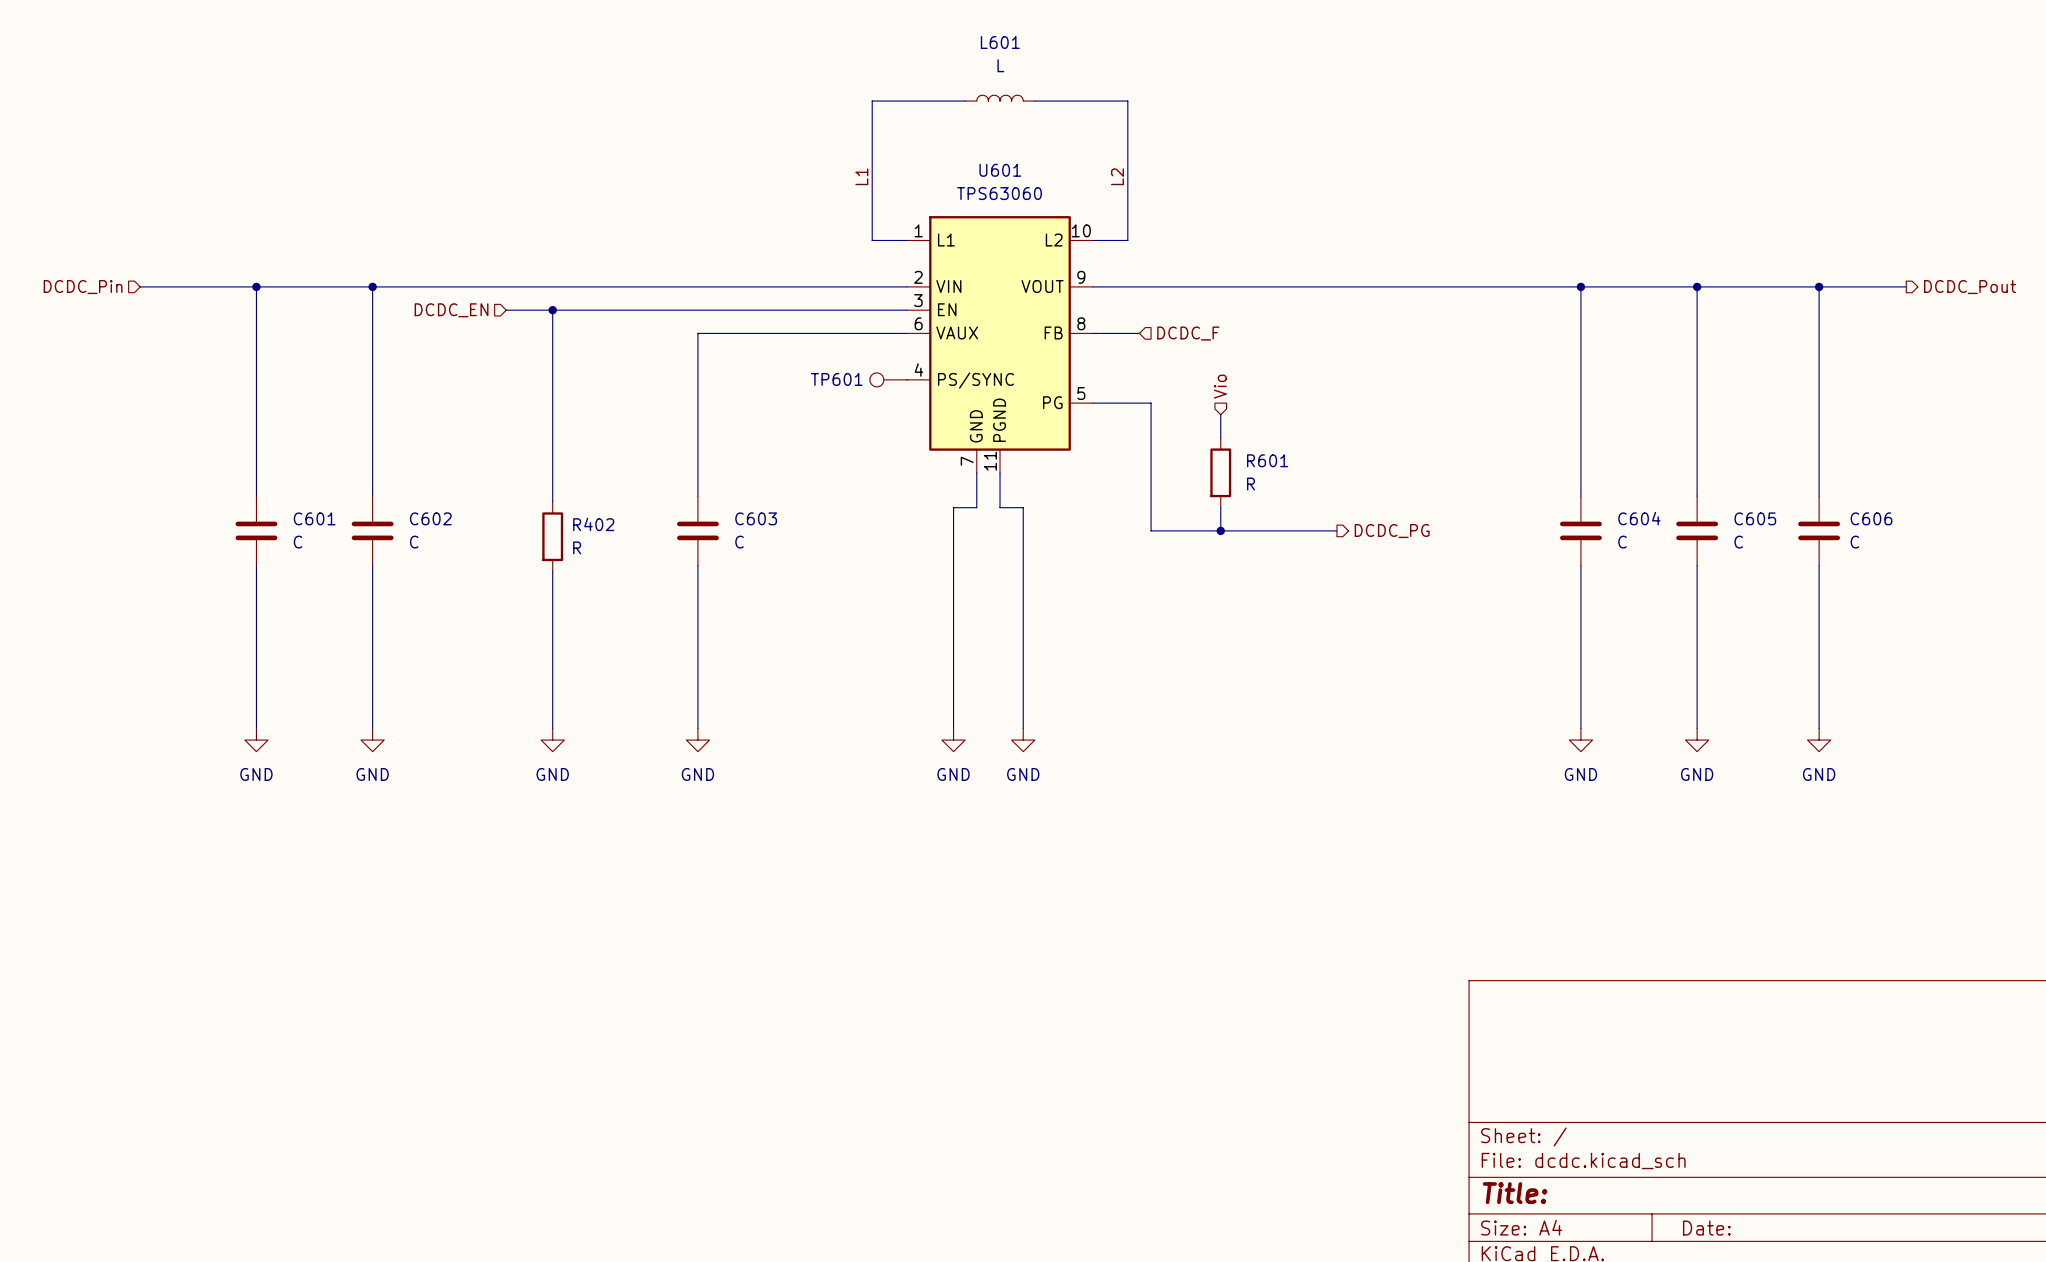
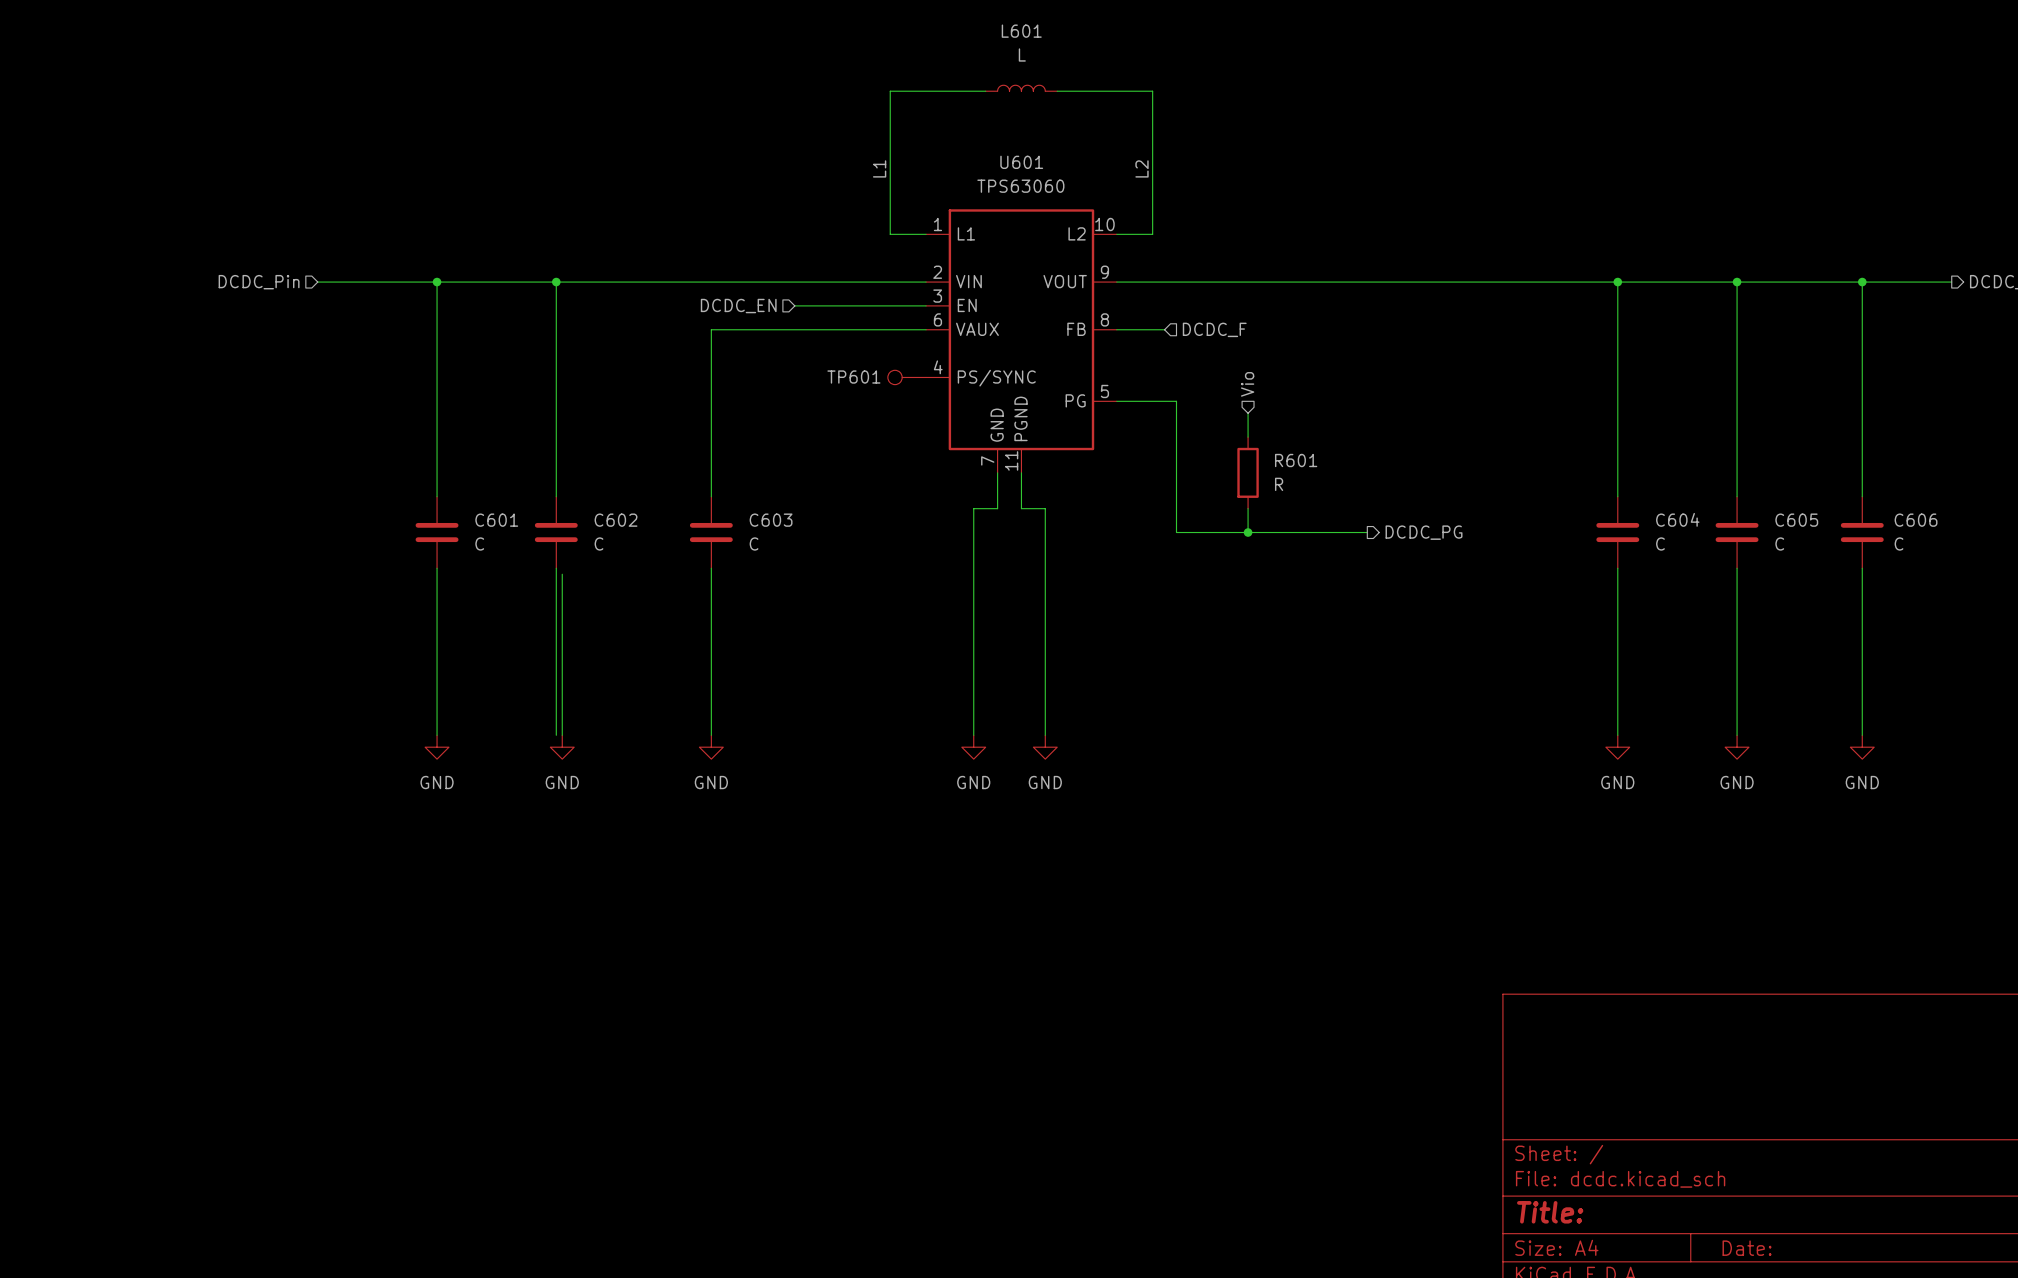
wire: (140, 286) (314, 286) -> none
wire: (256, 286) (256, 496) -> (437, 282) (437, 496)
junction: (256, 286) -> none
wire: (372, 286) (372, 496) -> (556, 282) (556, 496)
junction: (372, 286) -> none
junction: none -> (437, 282)
hierarchical label position: DCDC_Pin (83, 287) -> DCDC_Pin (259, 282)
hierarchical label: DCDC_EN (451, 310) -> none
wire: (506, 310) (779, 310) -> none
wire: (552, 310) (552, 501) -> none
junction position: (552, 310) -> (556, 282)
hierarchical label: none -> DCDC_EN (738, 306)
C601 position: (256, 530) -> (437, 532)
C602 position: (372, 530) -> (556, 532)
R402: R (552, 536) -> none
wire: (256, 565) (256, 728) -> (437, 568) (437, 735)
wire: (372, 565) (372, 728) -> (556, 568) (556, 735)
power symbol: GND (256, 740) -> none
power symbol position: GND (372, 740) -> GND (437, 747)

